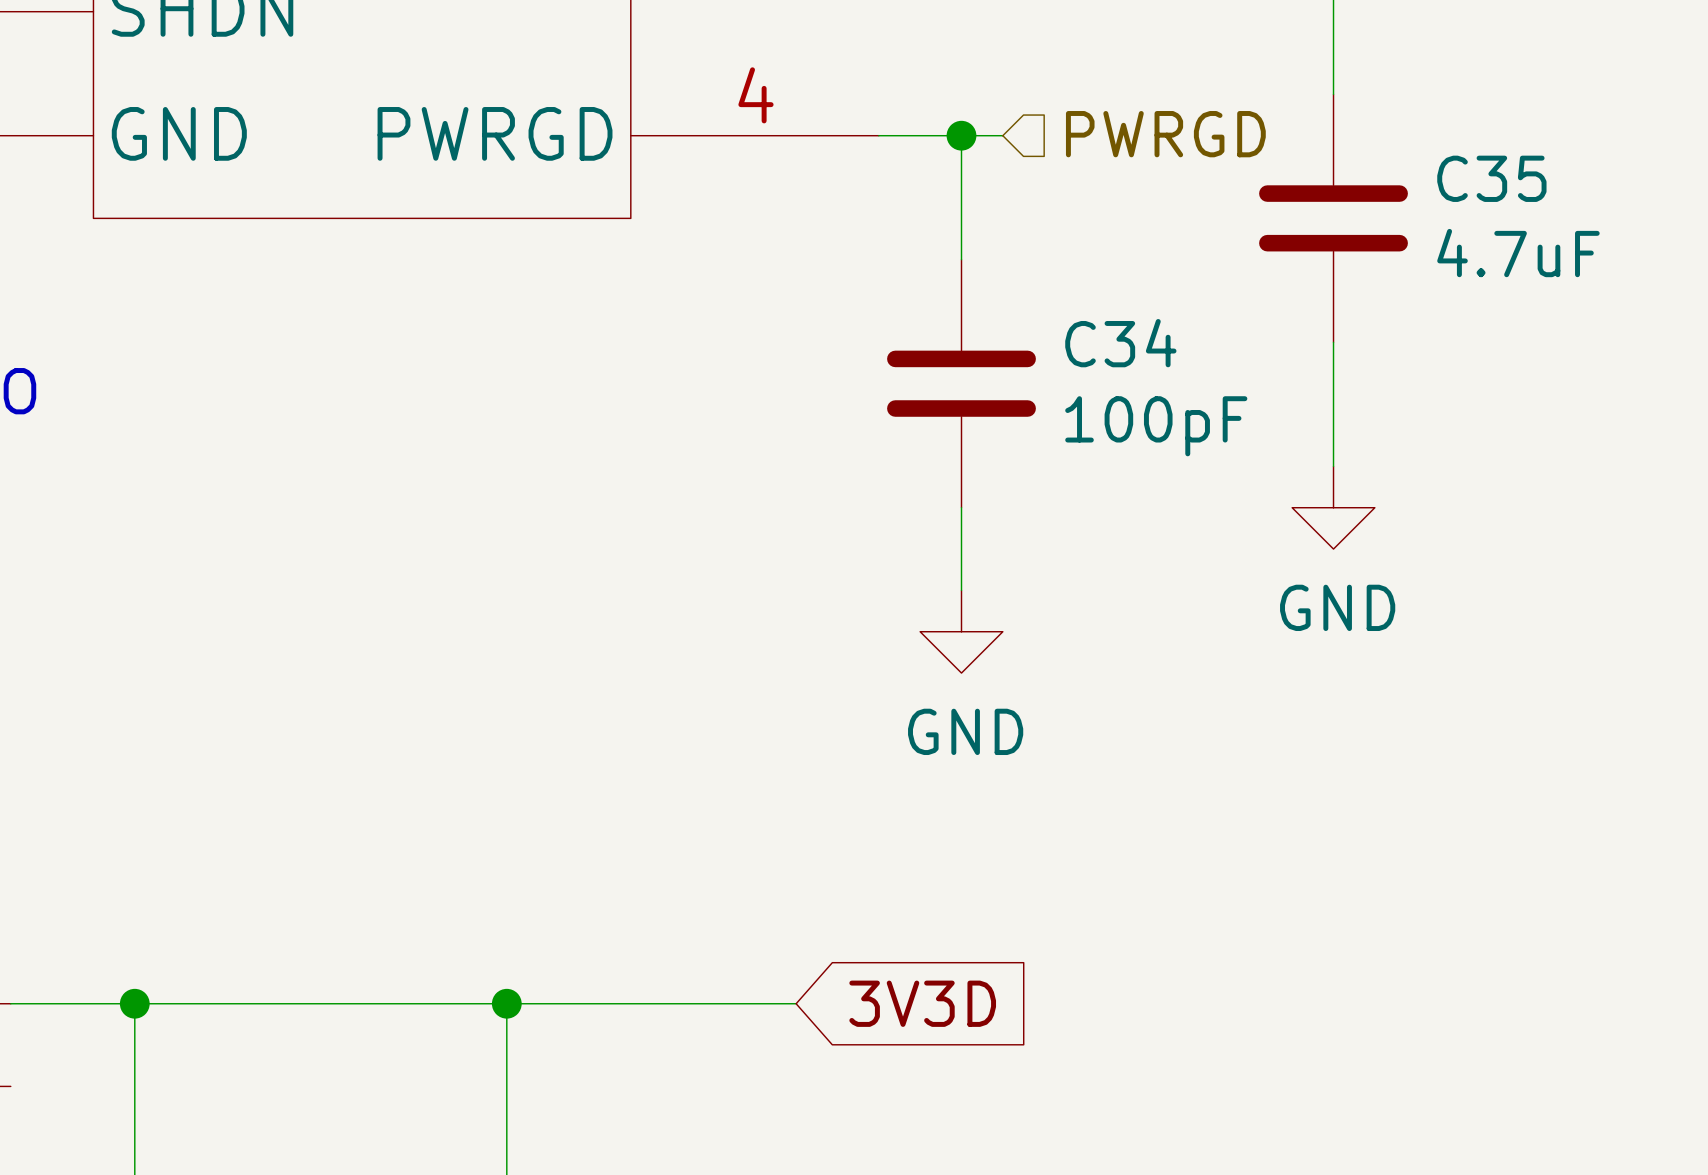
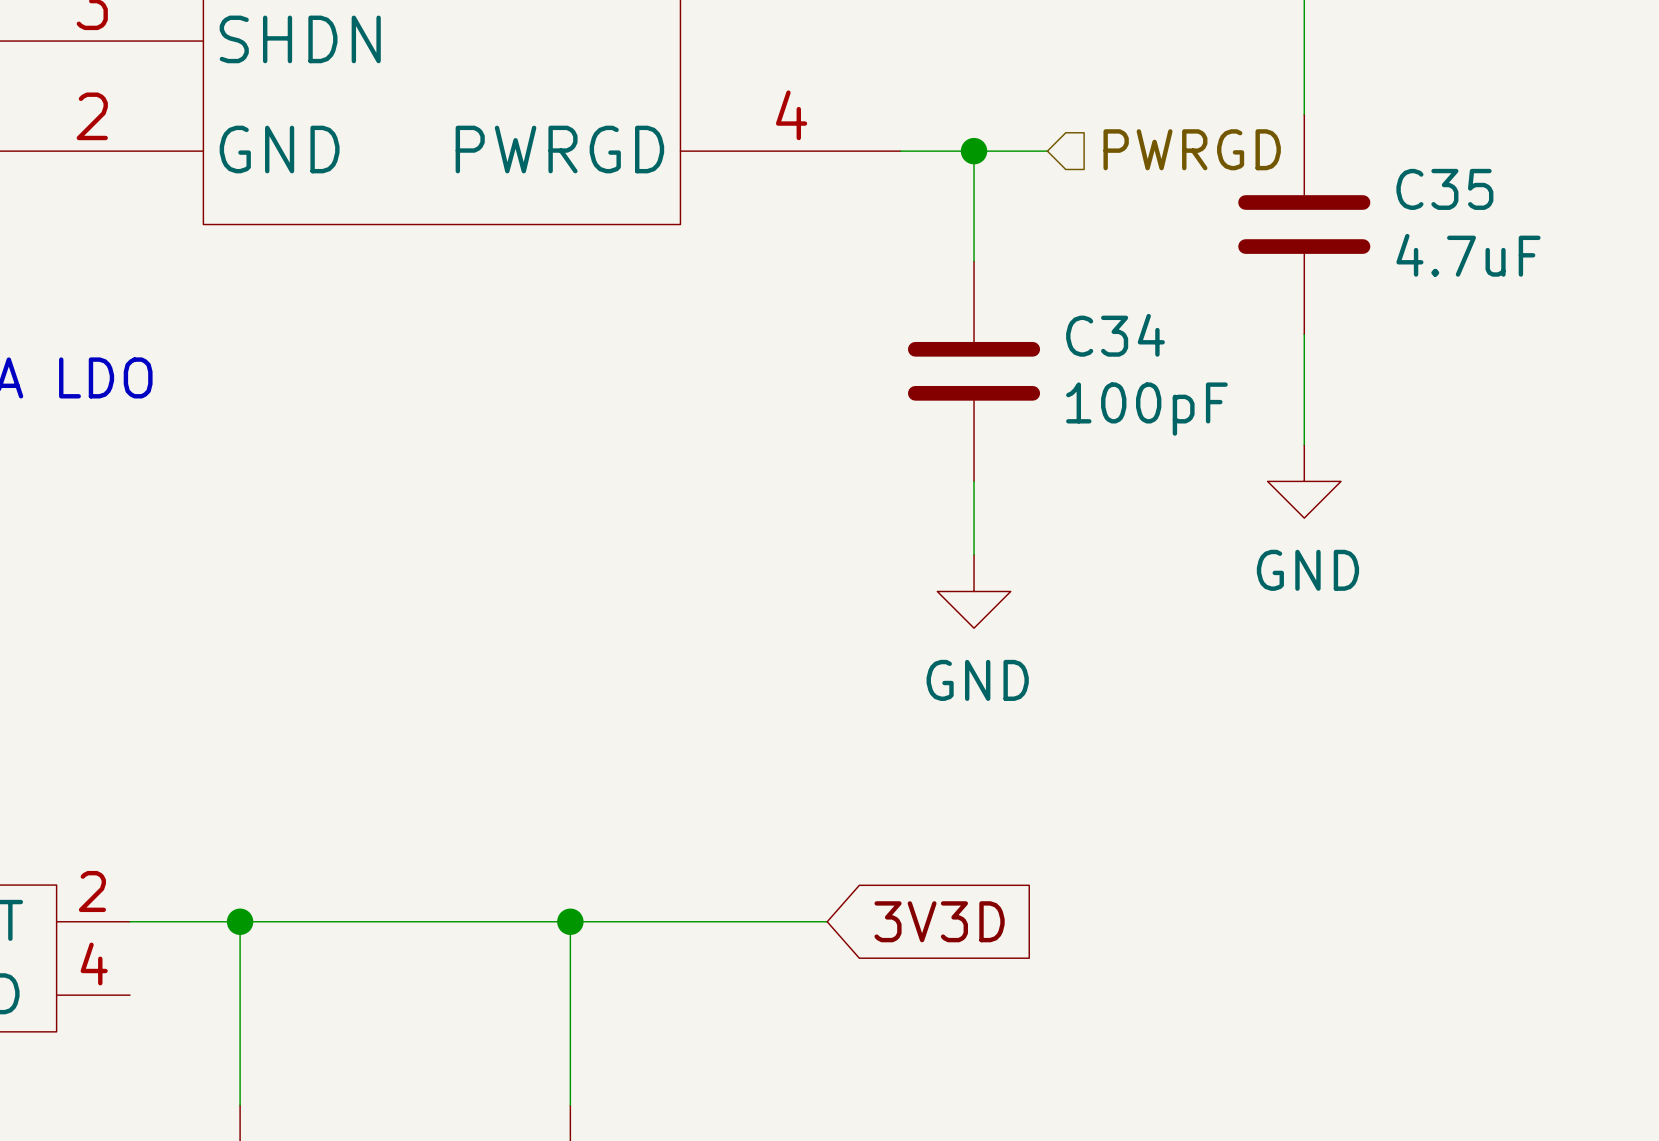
hierarchical label position: PWRGD (1165, 134) -> PWRGD (1192, 149)
wire: none -> (1010, 151) (1047, 151)

